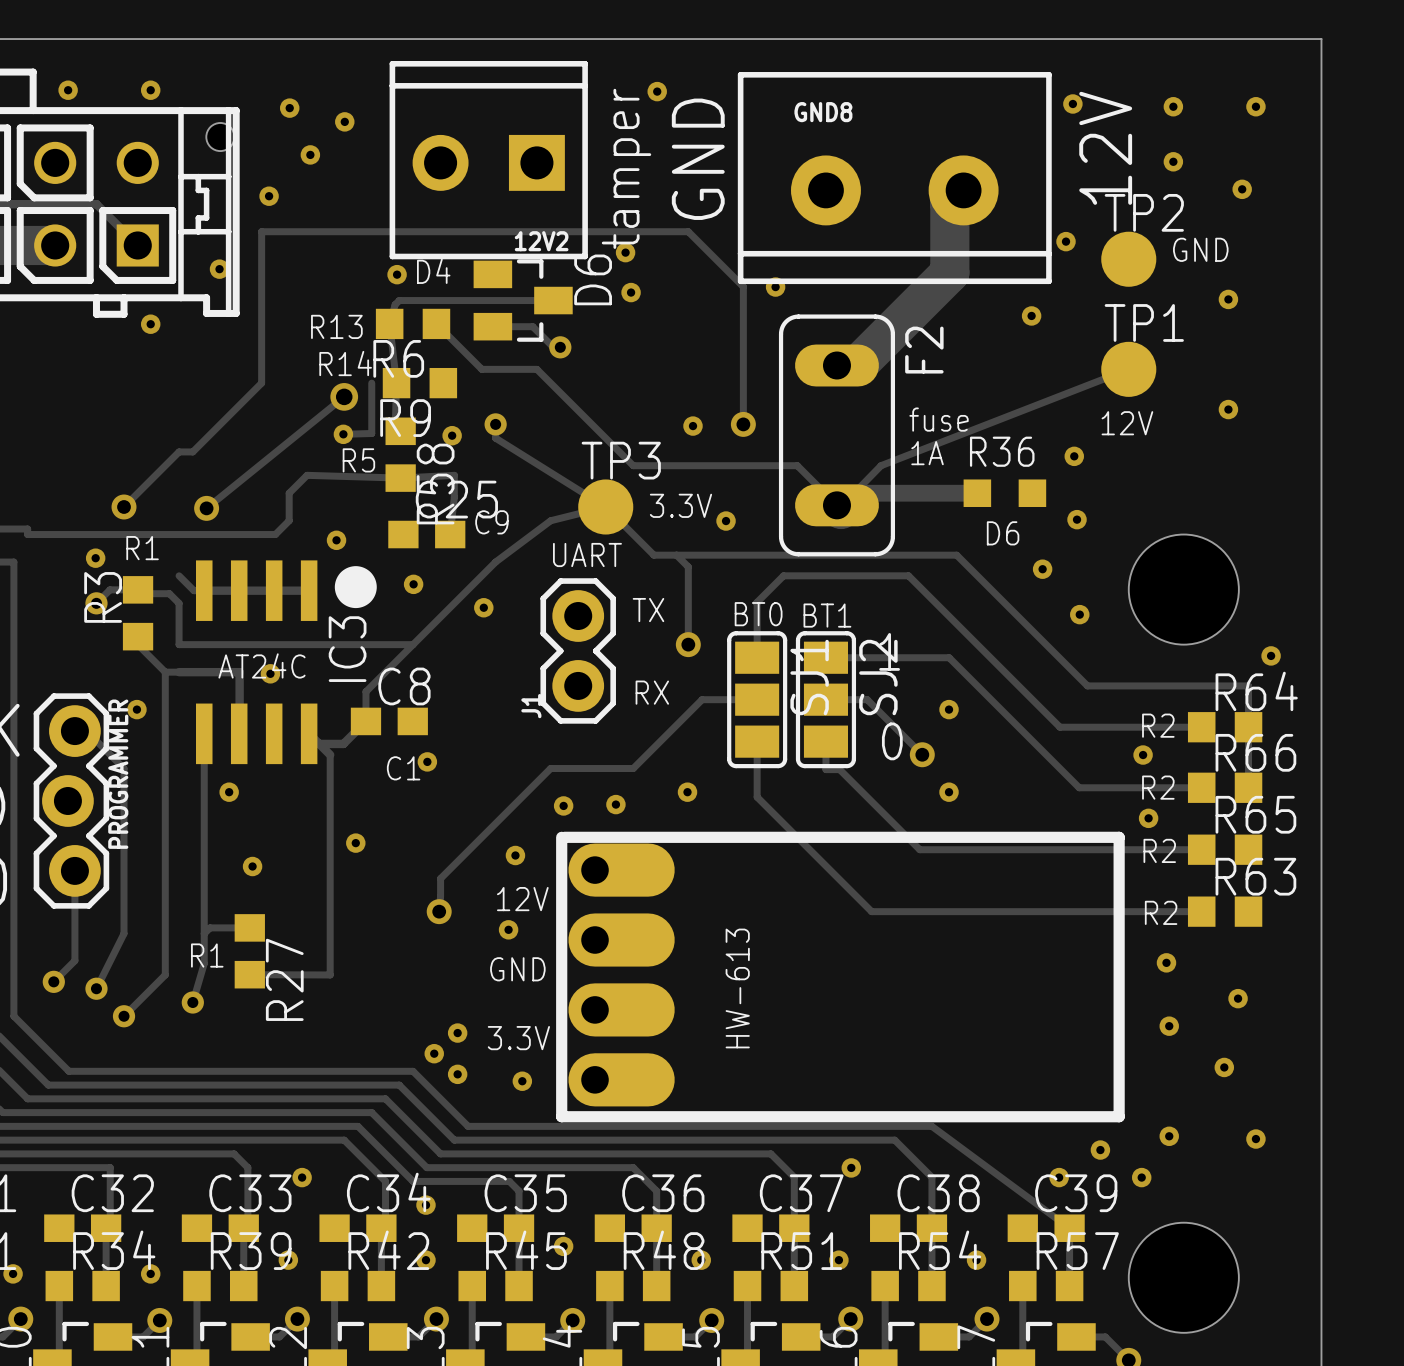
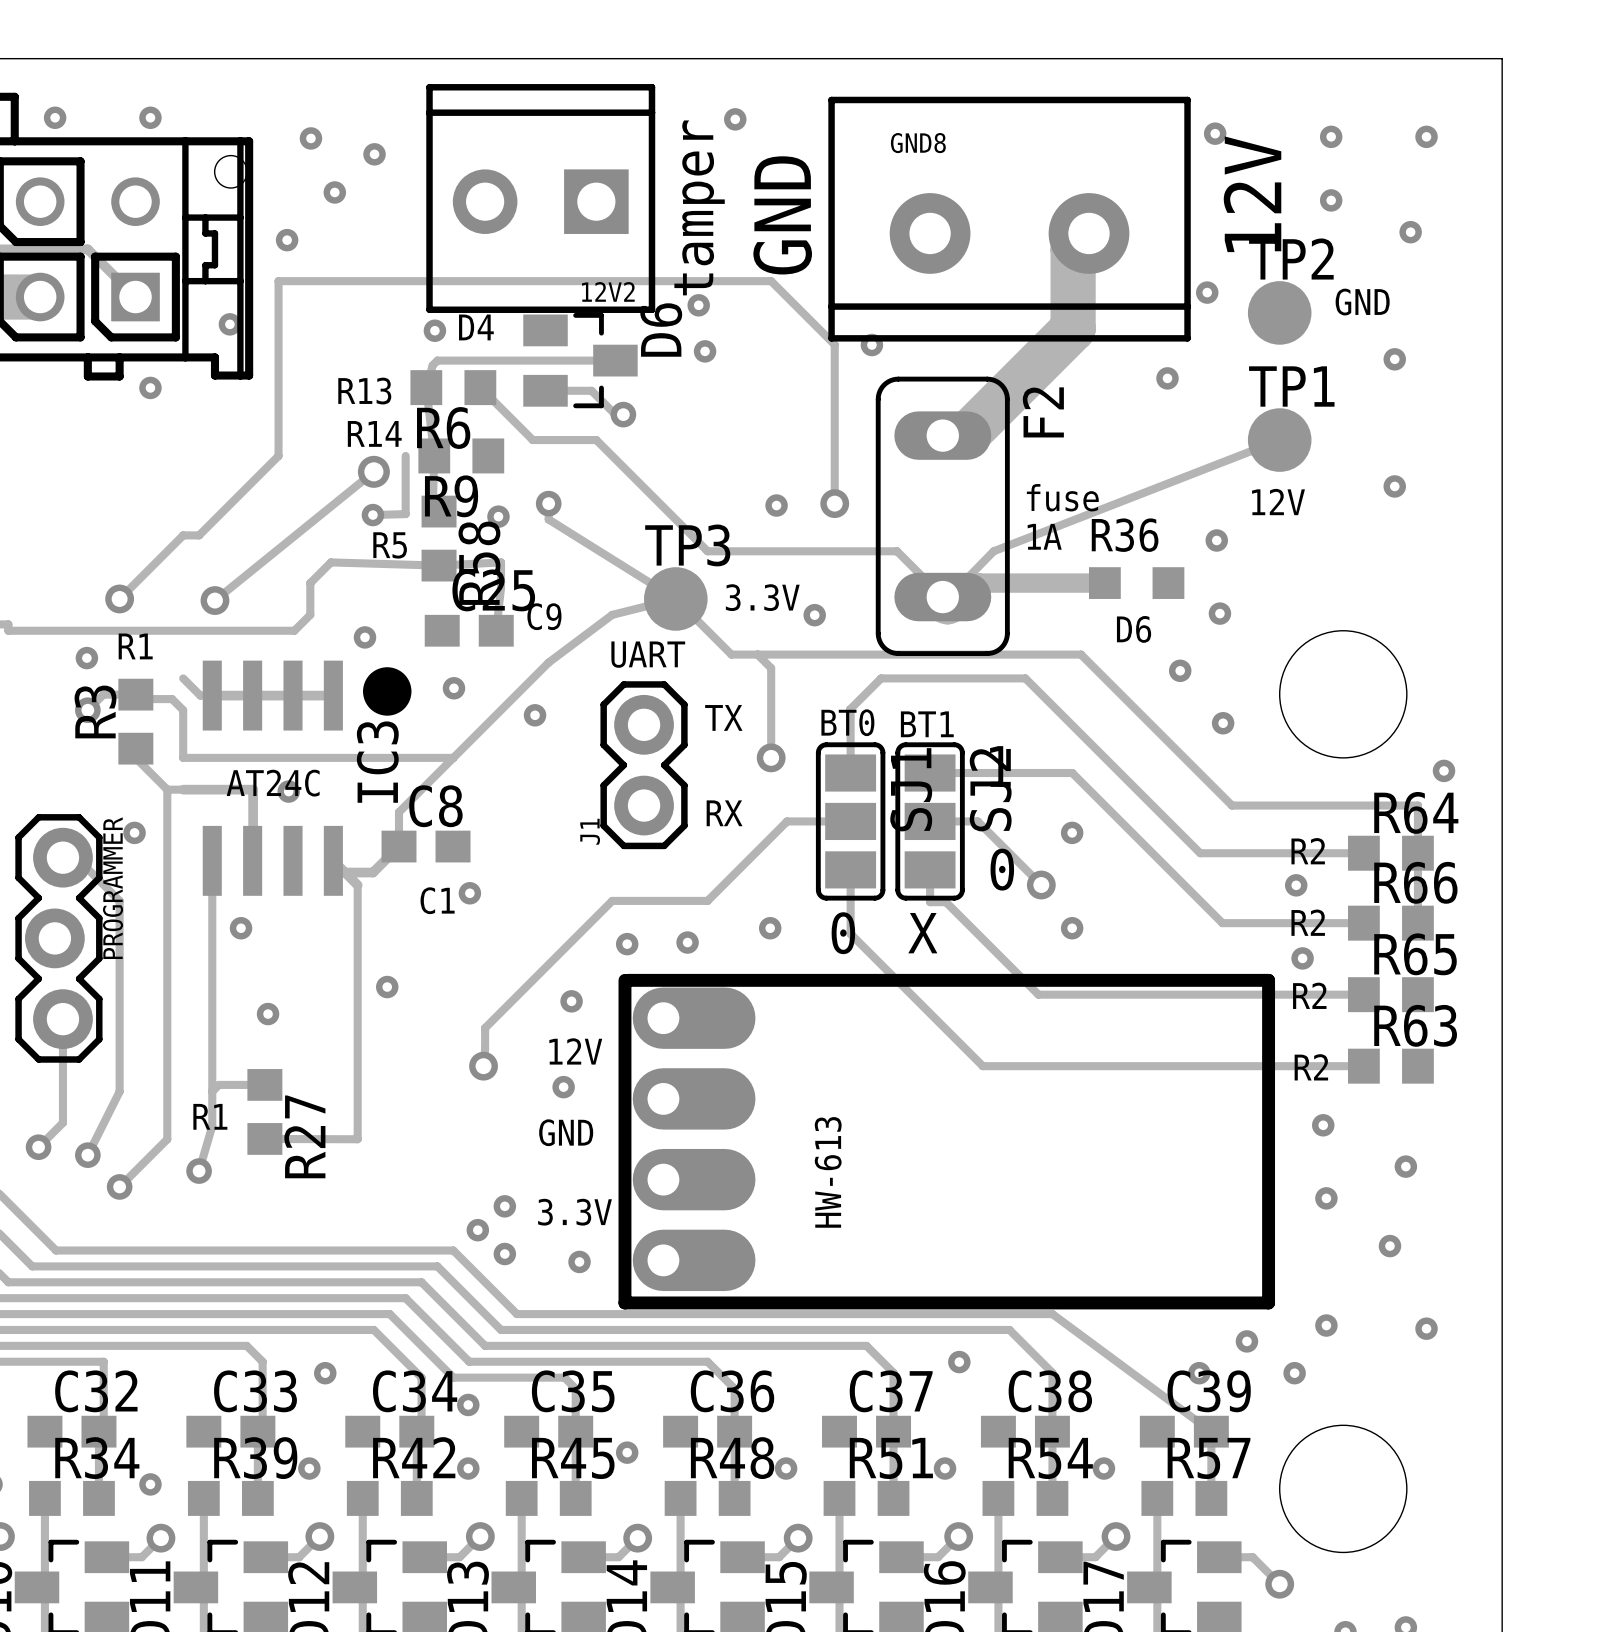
text: none -> 0 (843, 933)
text: none -> X (922, 933)

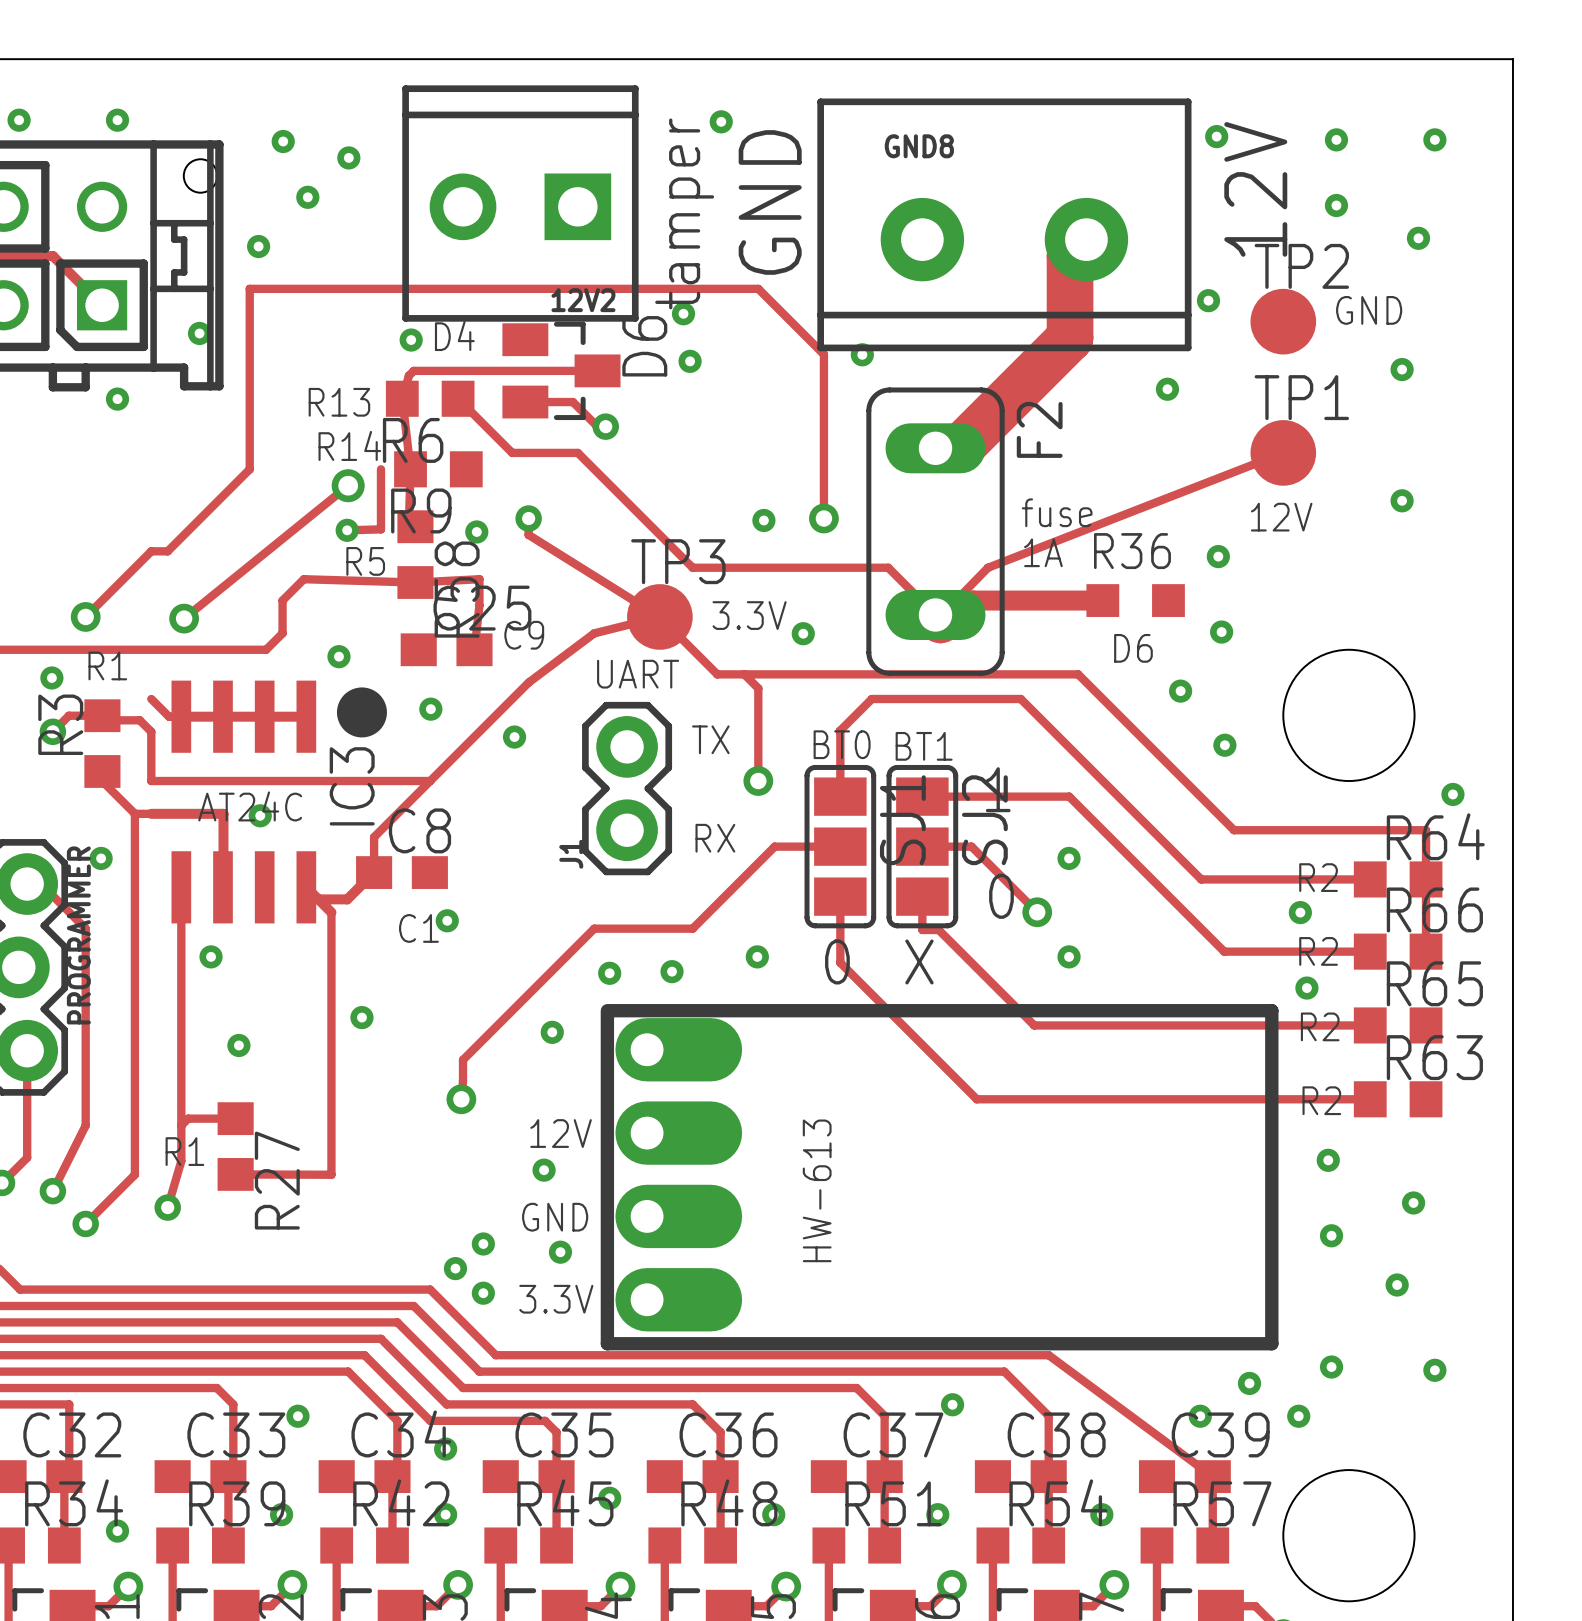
text position: 12V (575, 1051) -> 12V (561, 1133)
via position: (563, 1087) -> (544, 1170)
text position: GND (566, 1132) -> GND (555, 1217)
text position: 3.3V (575, 1212) -> 3.3V (556, 1299)
via position: (579, 1261) -> (560, 1252)

